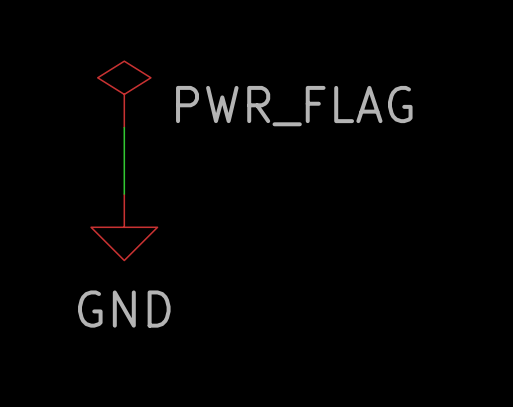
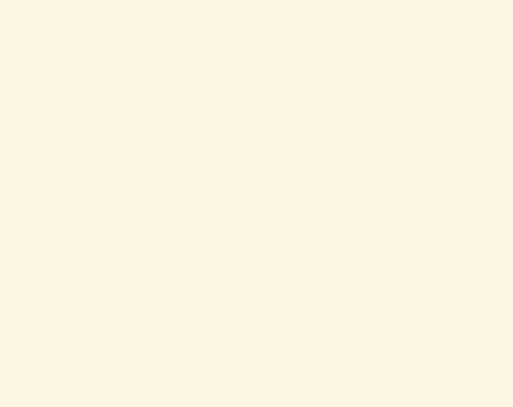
power symbol: PWR_FLAG (124, 94) -> none
wire: (124, 127) (124, 194) -> none
power symbol: GND (124, 227) -> none

